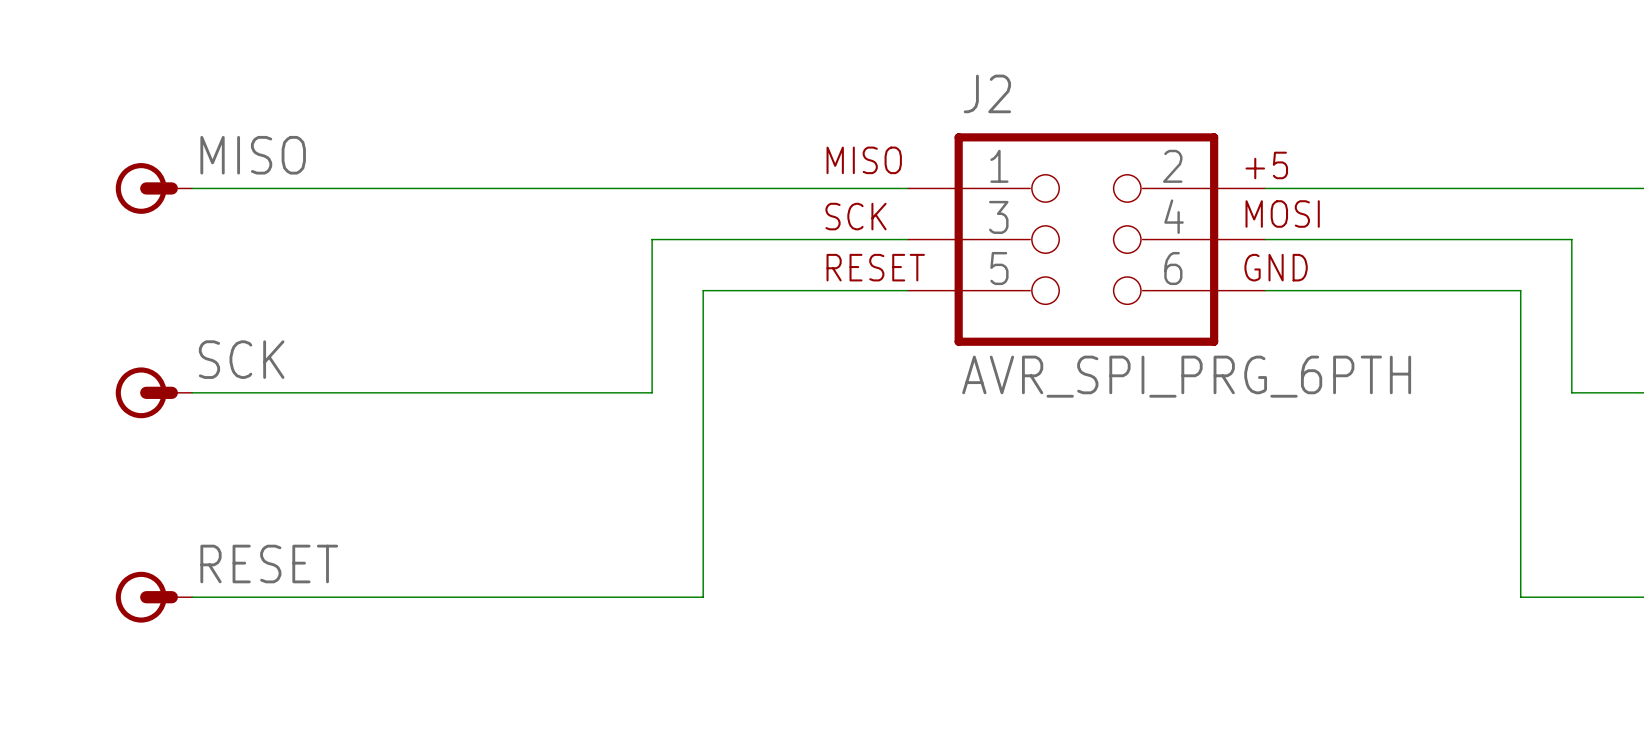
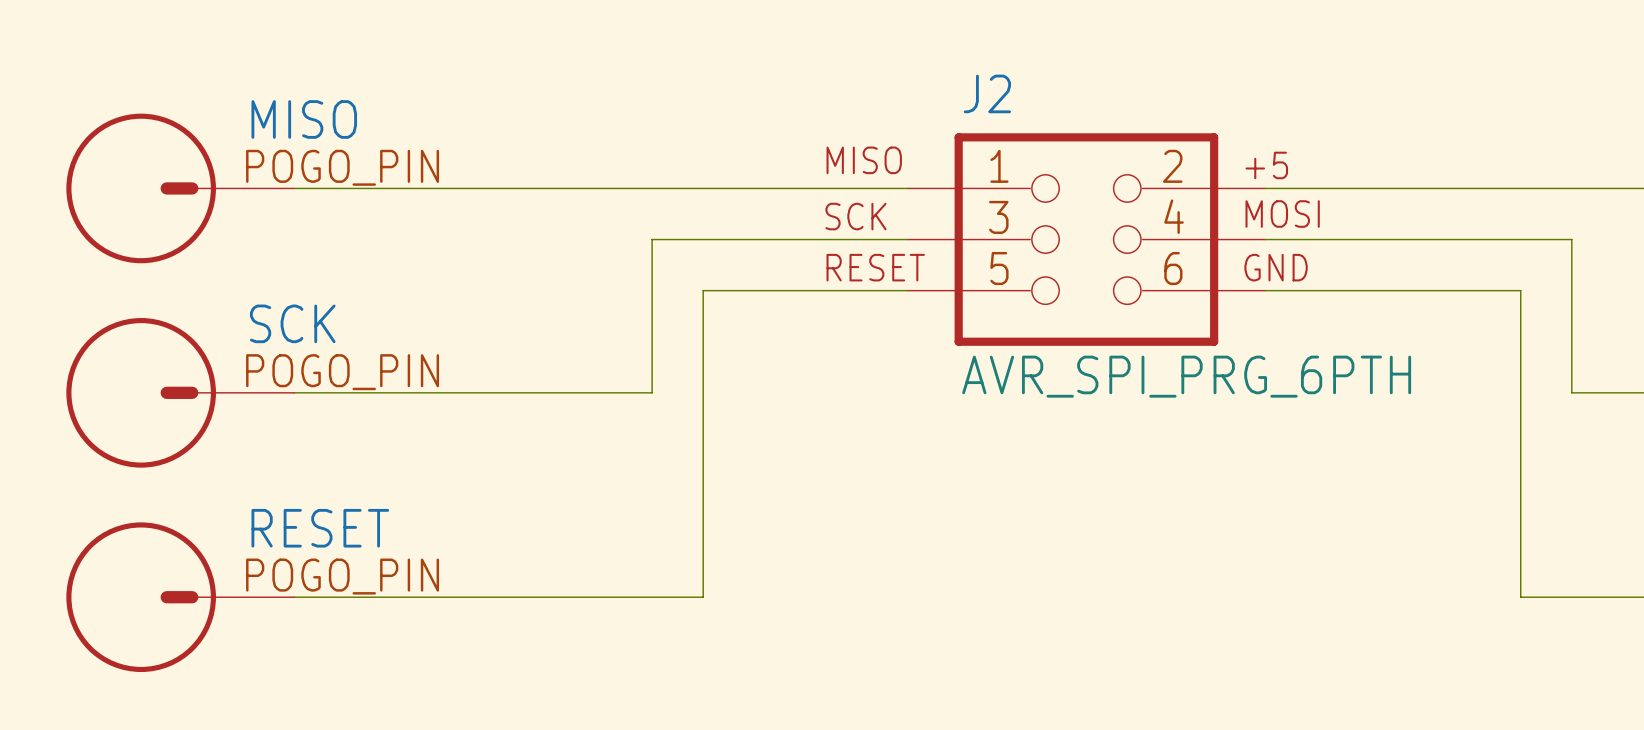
MISO: (154, 188) -> none
MISO: none -> (180, 188)
SCK: (154, 392) -> none
SCK: none -> (180, 392)
RESET: (154, 597) -> none
RESET: none -> (180, 597)

